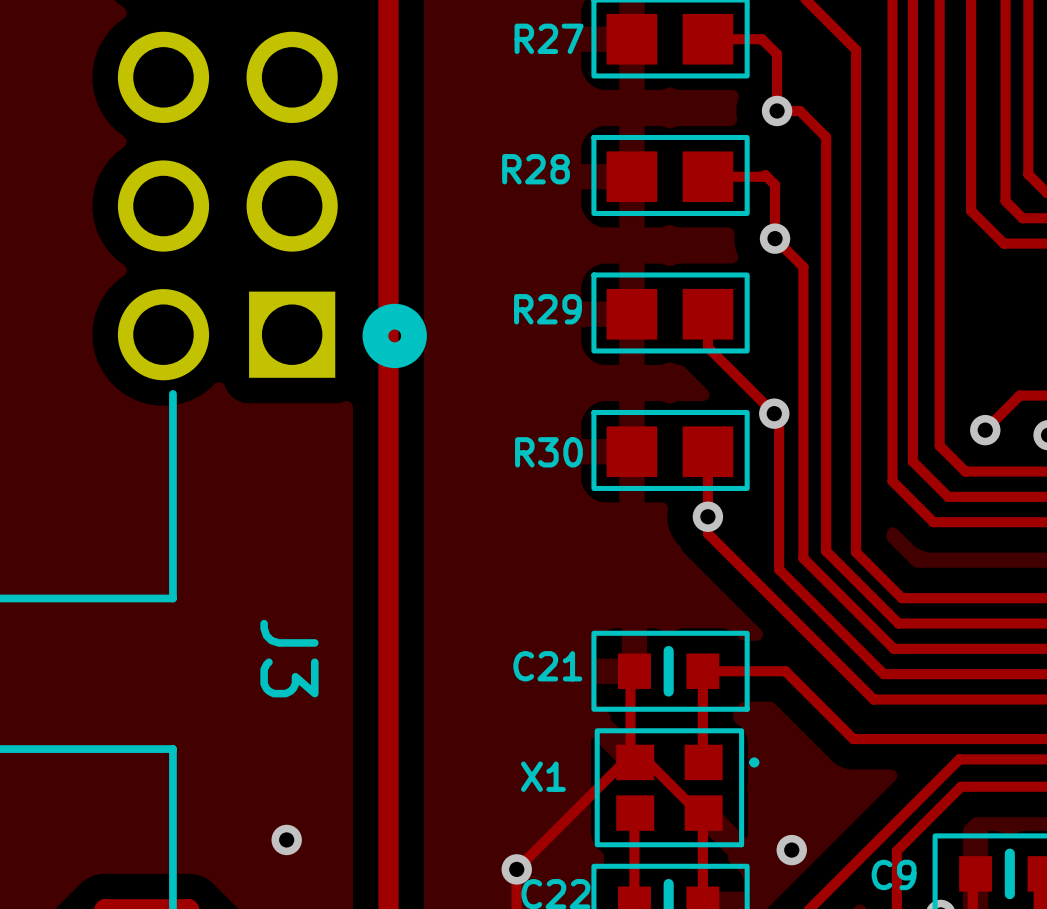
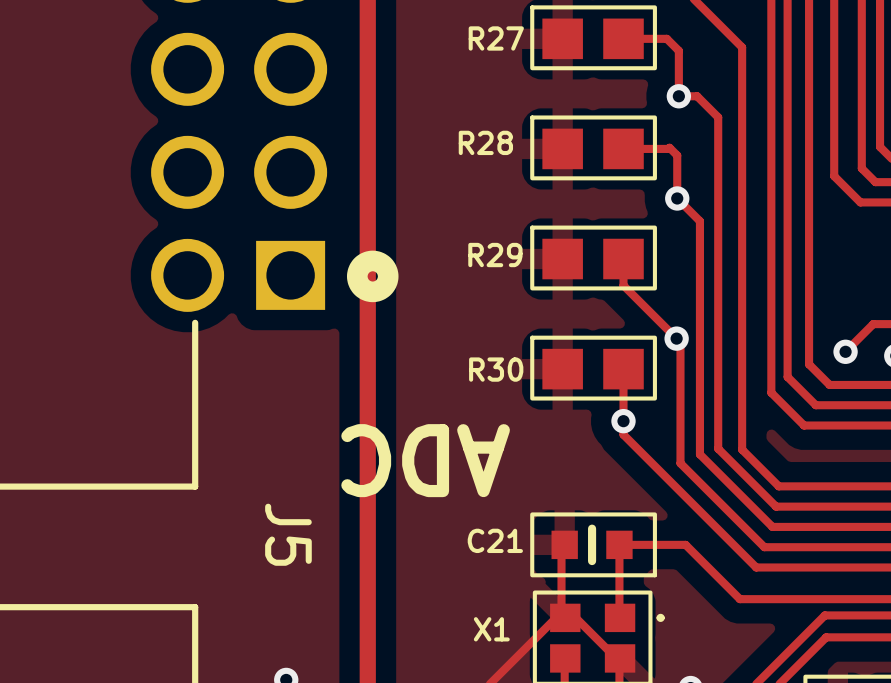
text: none -> ADC (425, 460)
J3 name: J3 (289, 658) -> J5 (288, 534)

